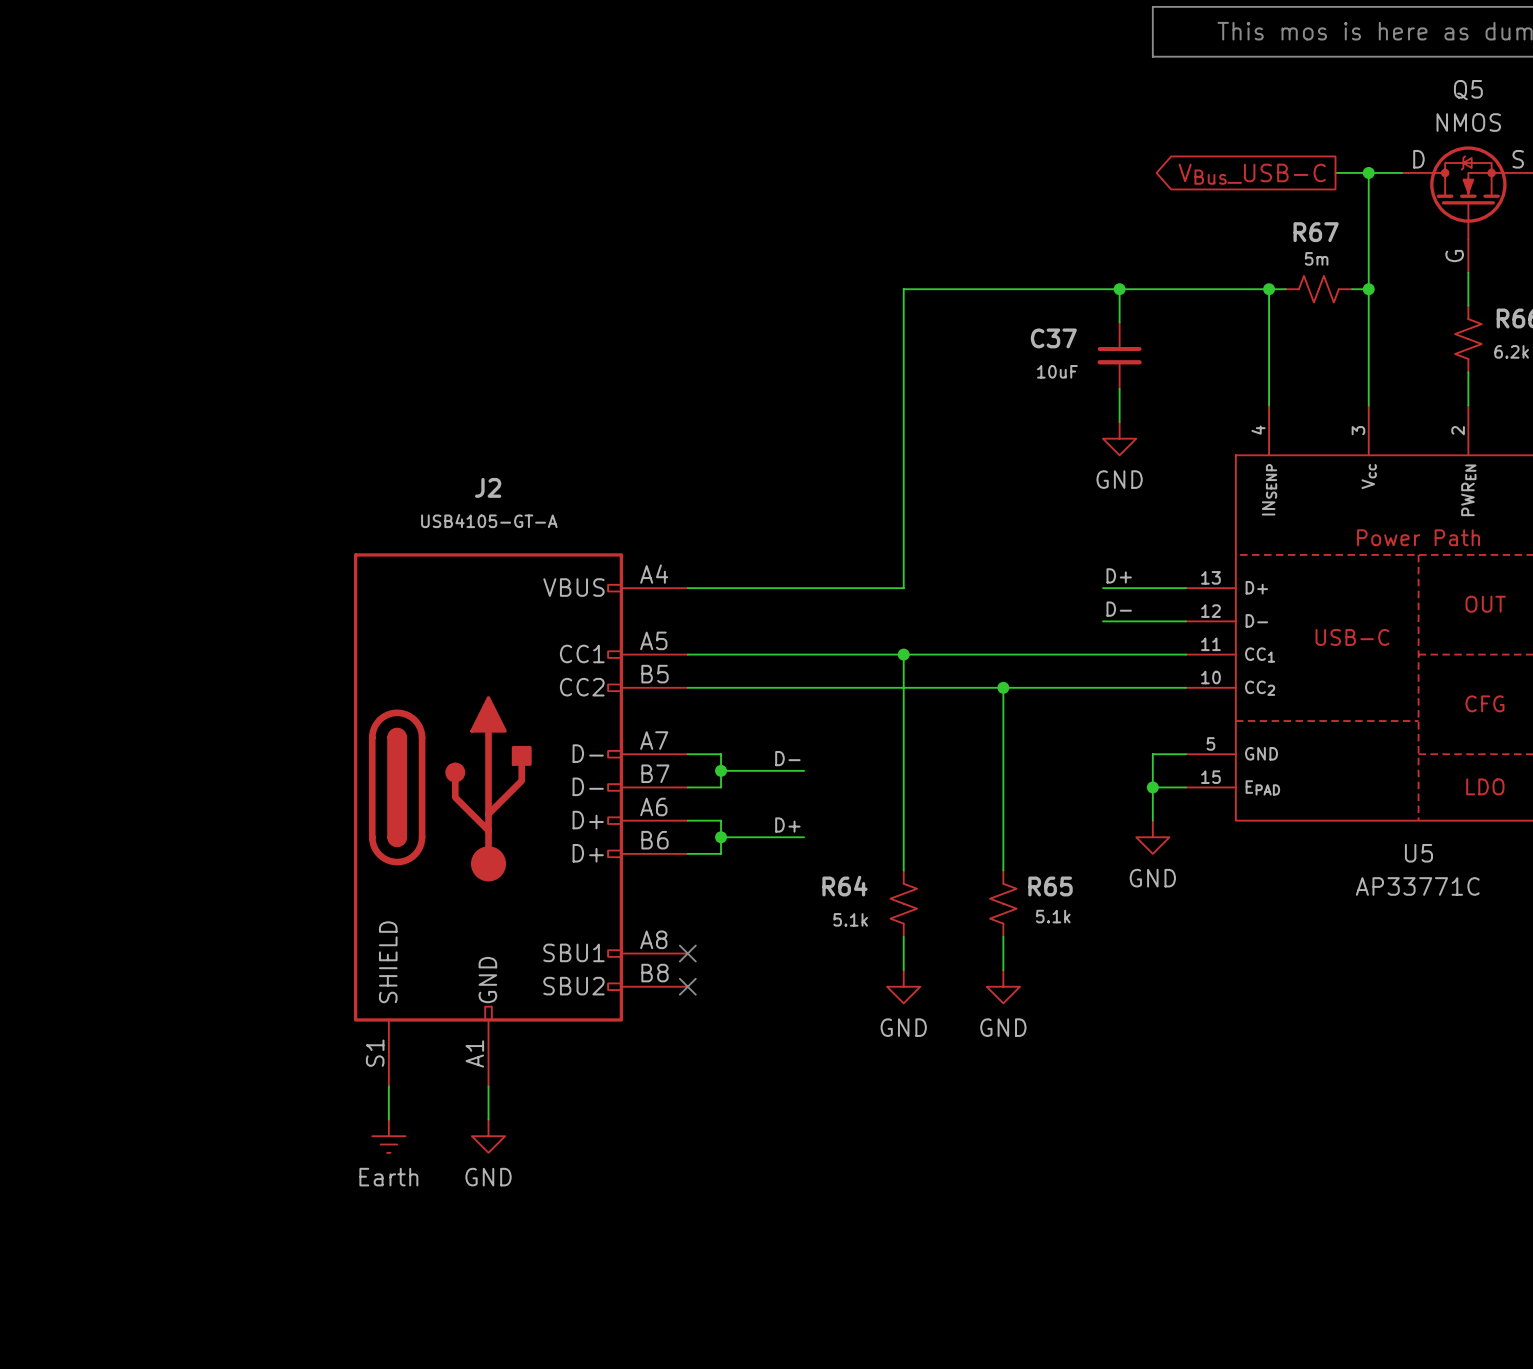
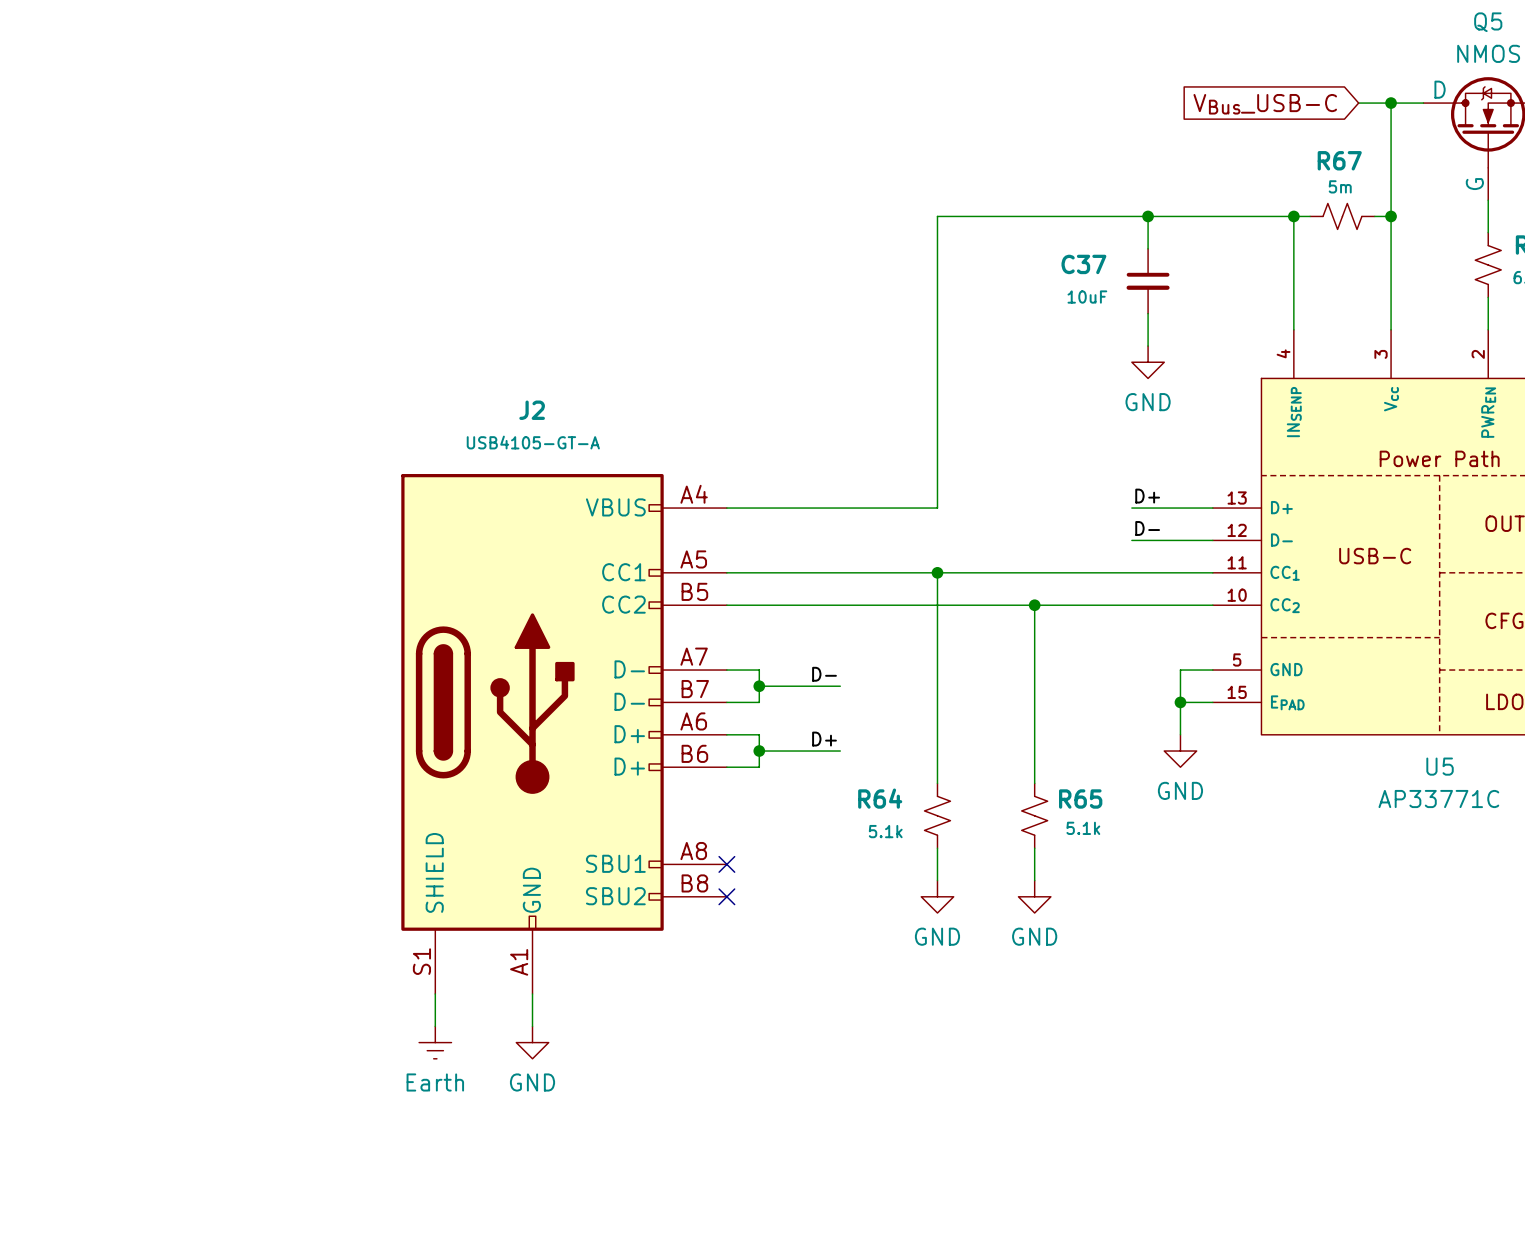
global label shape: output (1252, 174) -> input (1265, 104)

